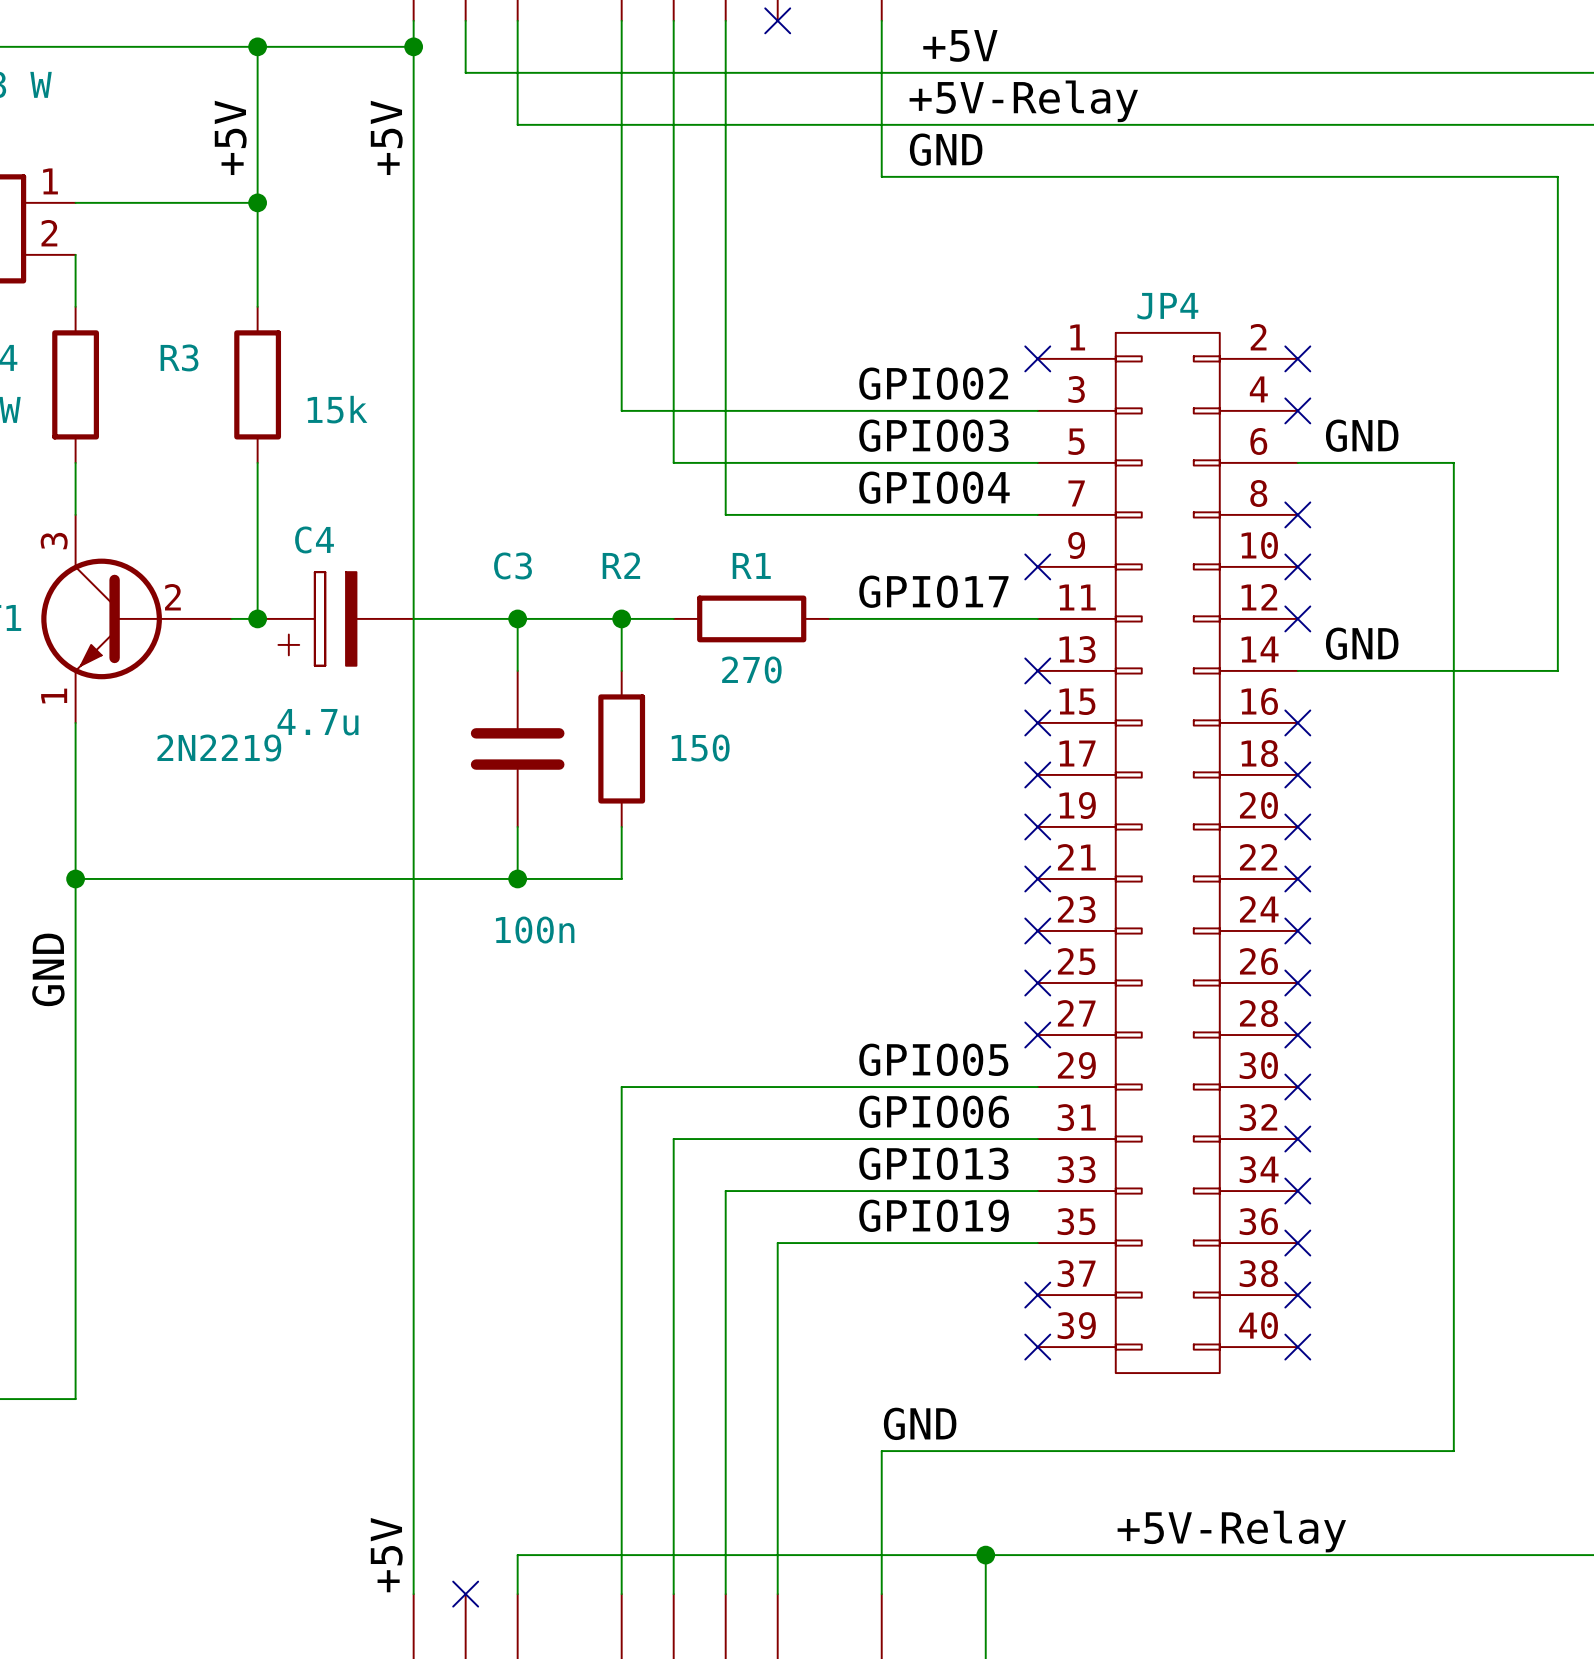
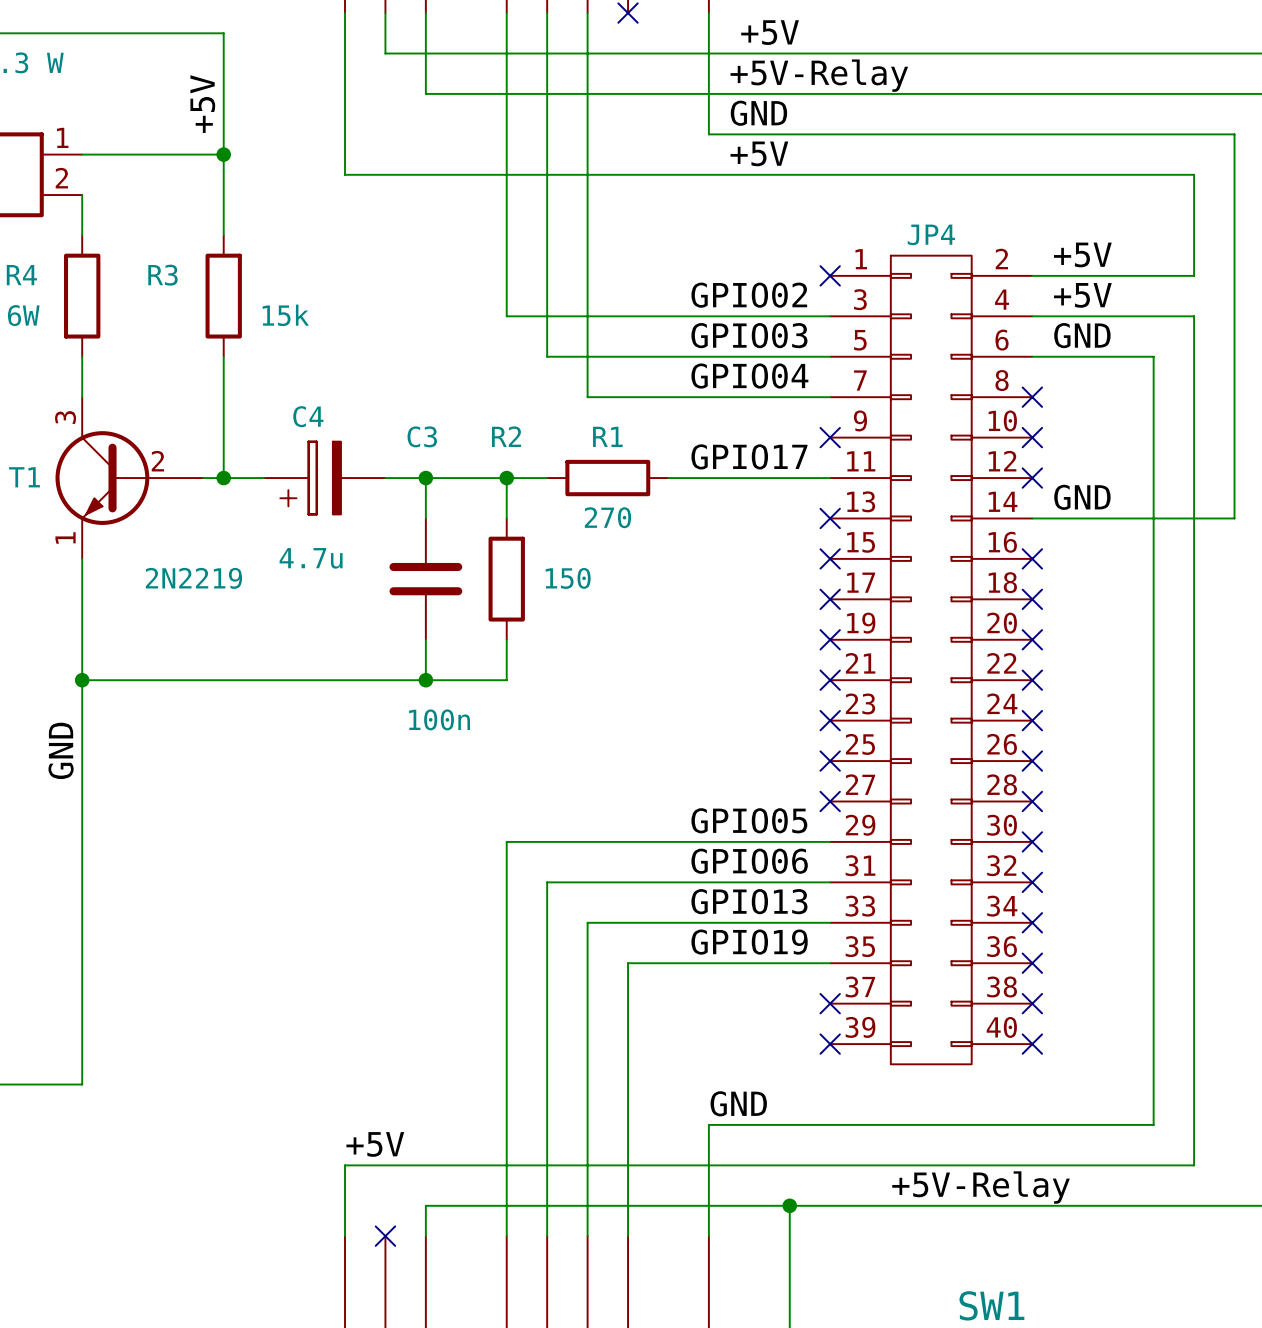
wire: (257, 46) (413, 46) -> none
junction: (257, 46) -> none
junction: (413, 46) -> none
label: +5V (386, 137) -> none
label: none -> +5V (759, 153)
wire: (413, 228) (413, 1503) -> (1032, 316) (1194, 316) (1194, 1165) (345, 1165)
wire: none -> (345, 174) (1194, 174) (1194, 275) (1032, 275)
label: none -> +5V (1082, 254)
no-connect mark: (1297, 358) -> none
label: none -> +5V (1082, 295)
no-connect mark: (1297, 410) -> none
C4 position: (335, 618) -> (324, 478)
label rotation: 0° (386, 1555) -> 90° clockwise (375, 1144)

